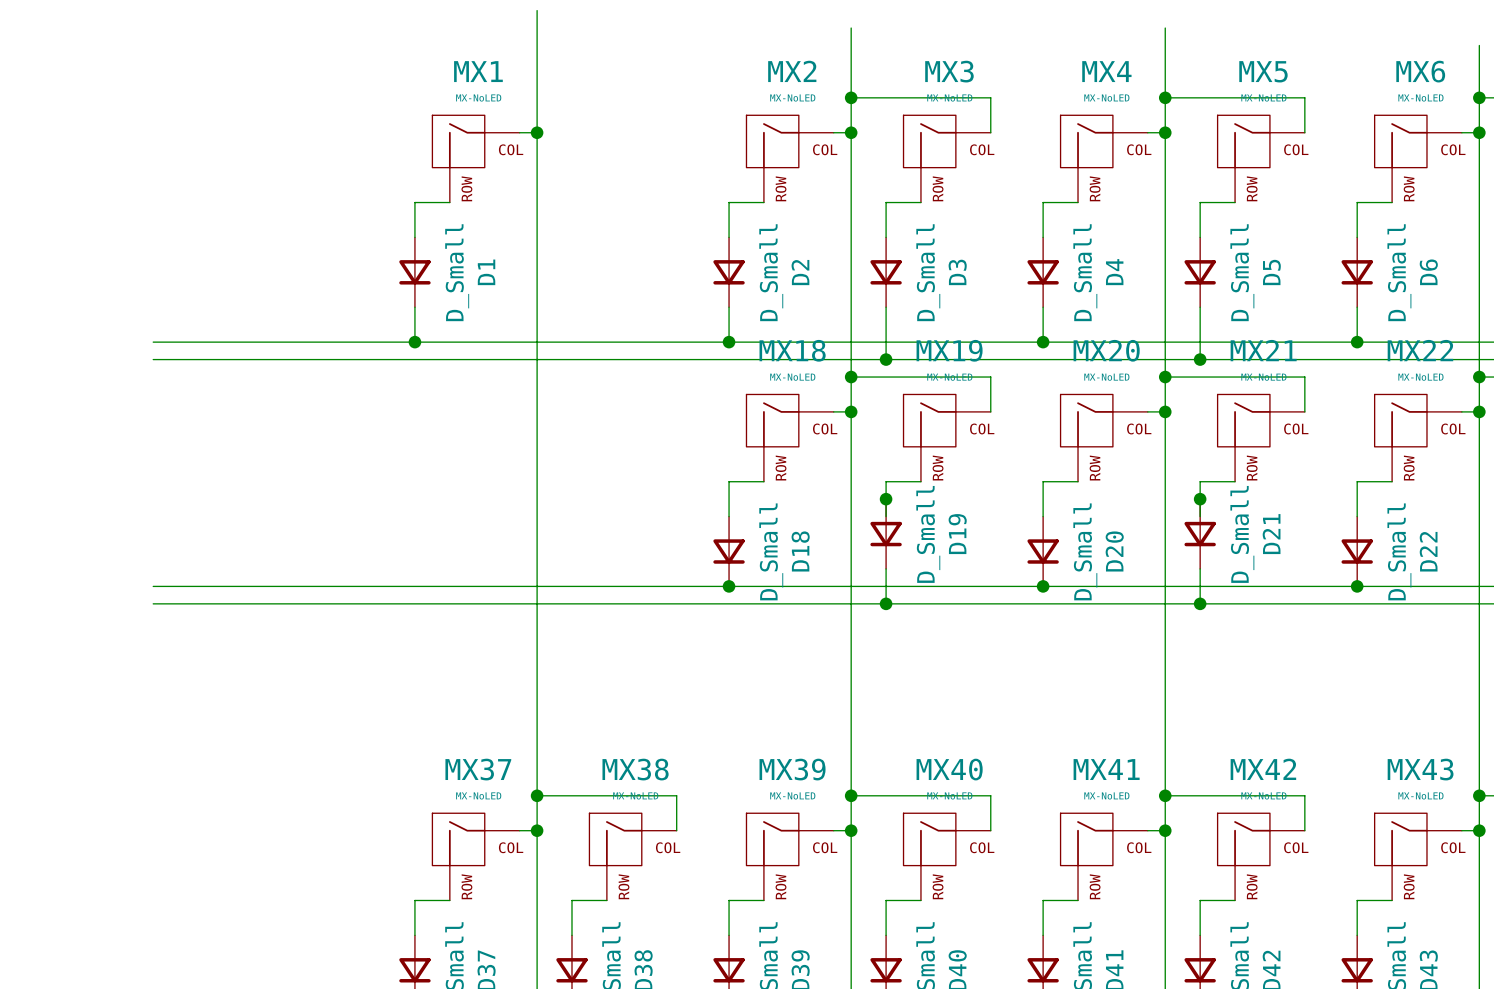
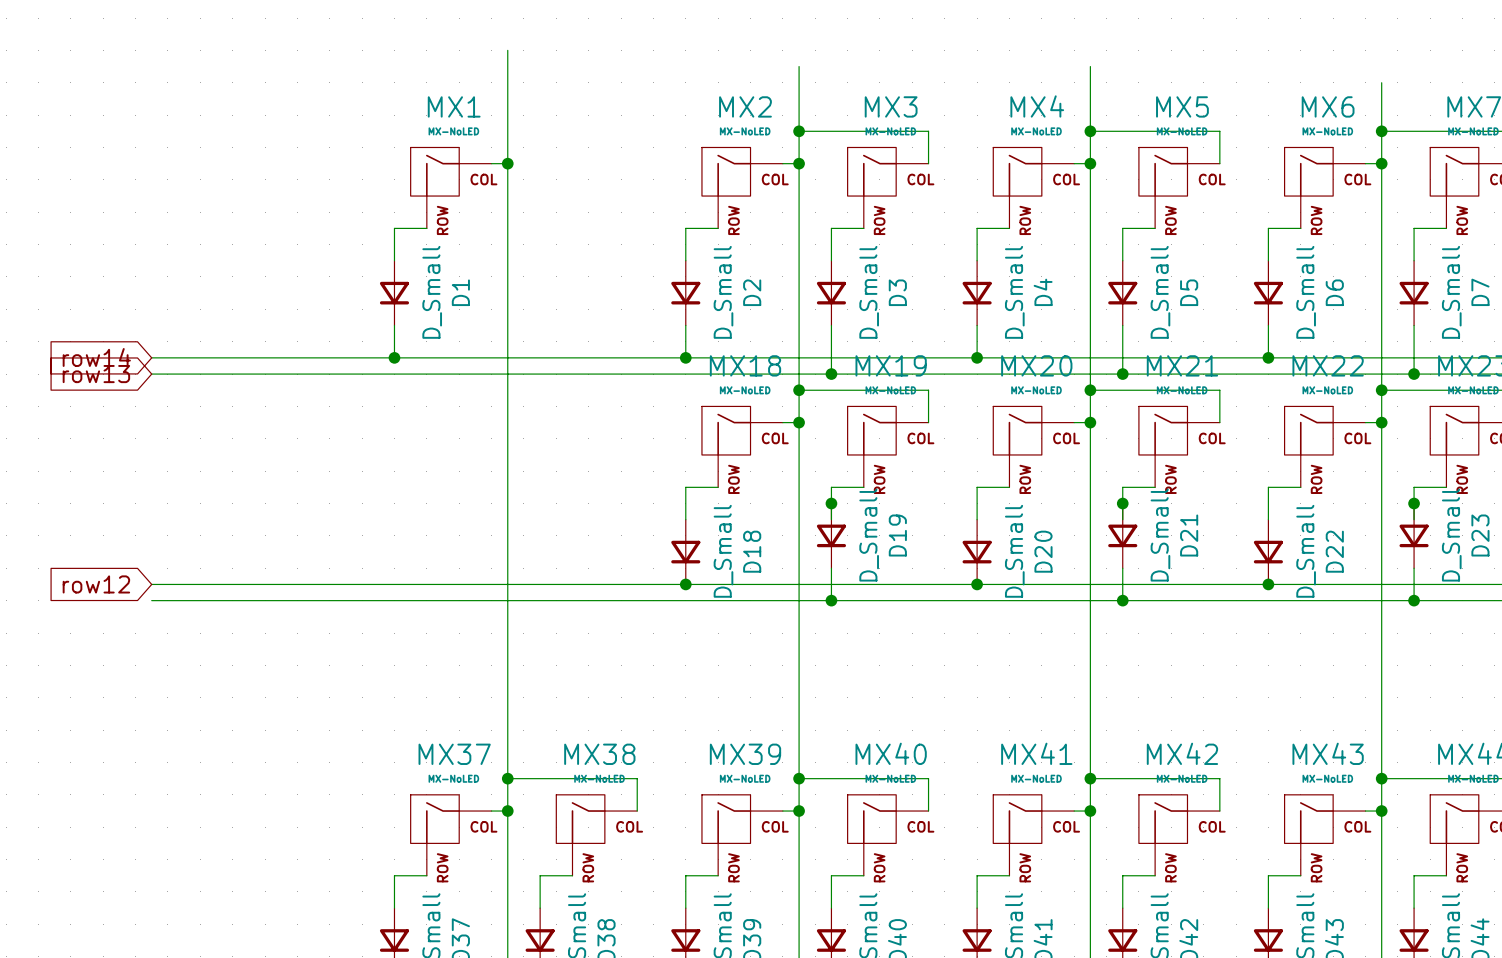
global label: none -> row14 (96, 357)
global label: none -> row13 (96, 374)
global label: none -> row12 (96, 584)

